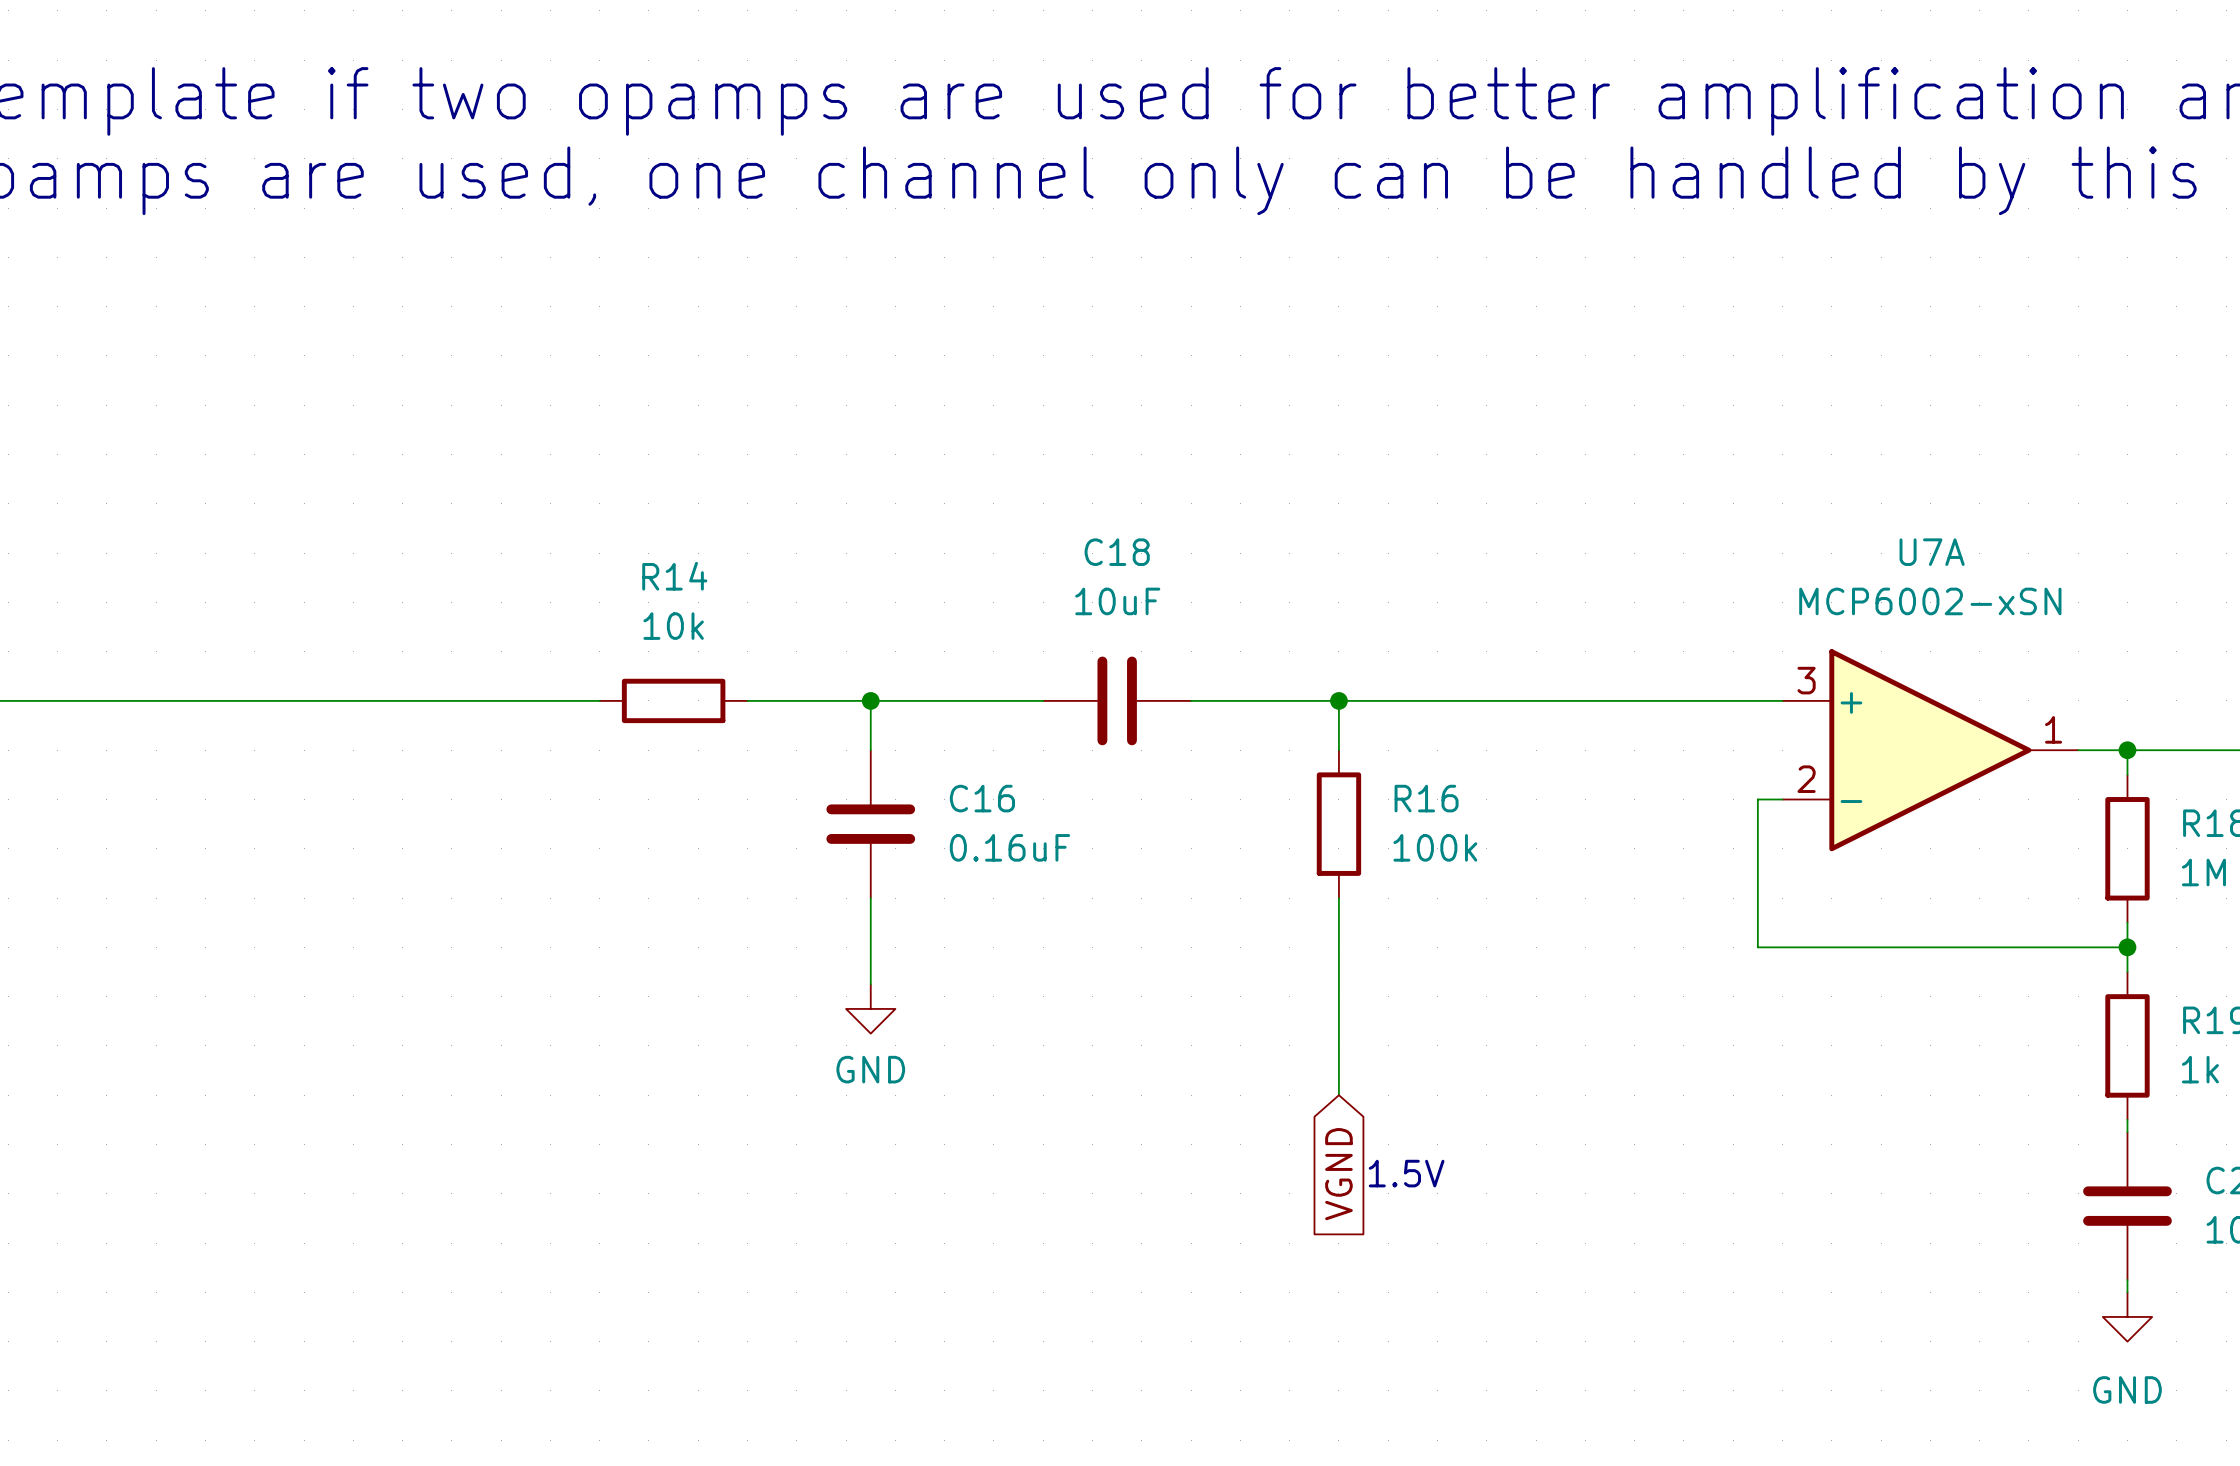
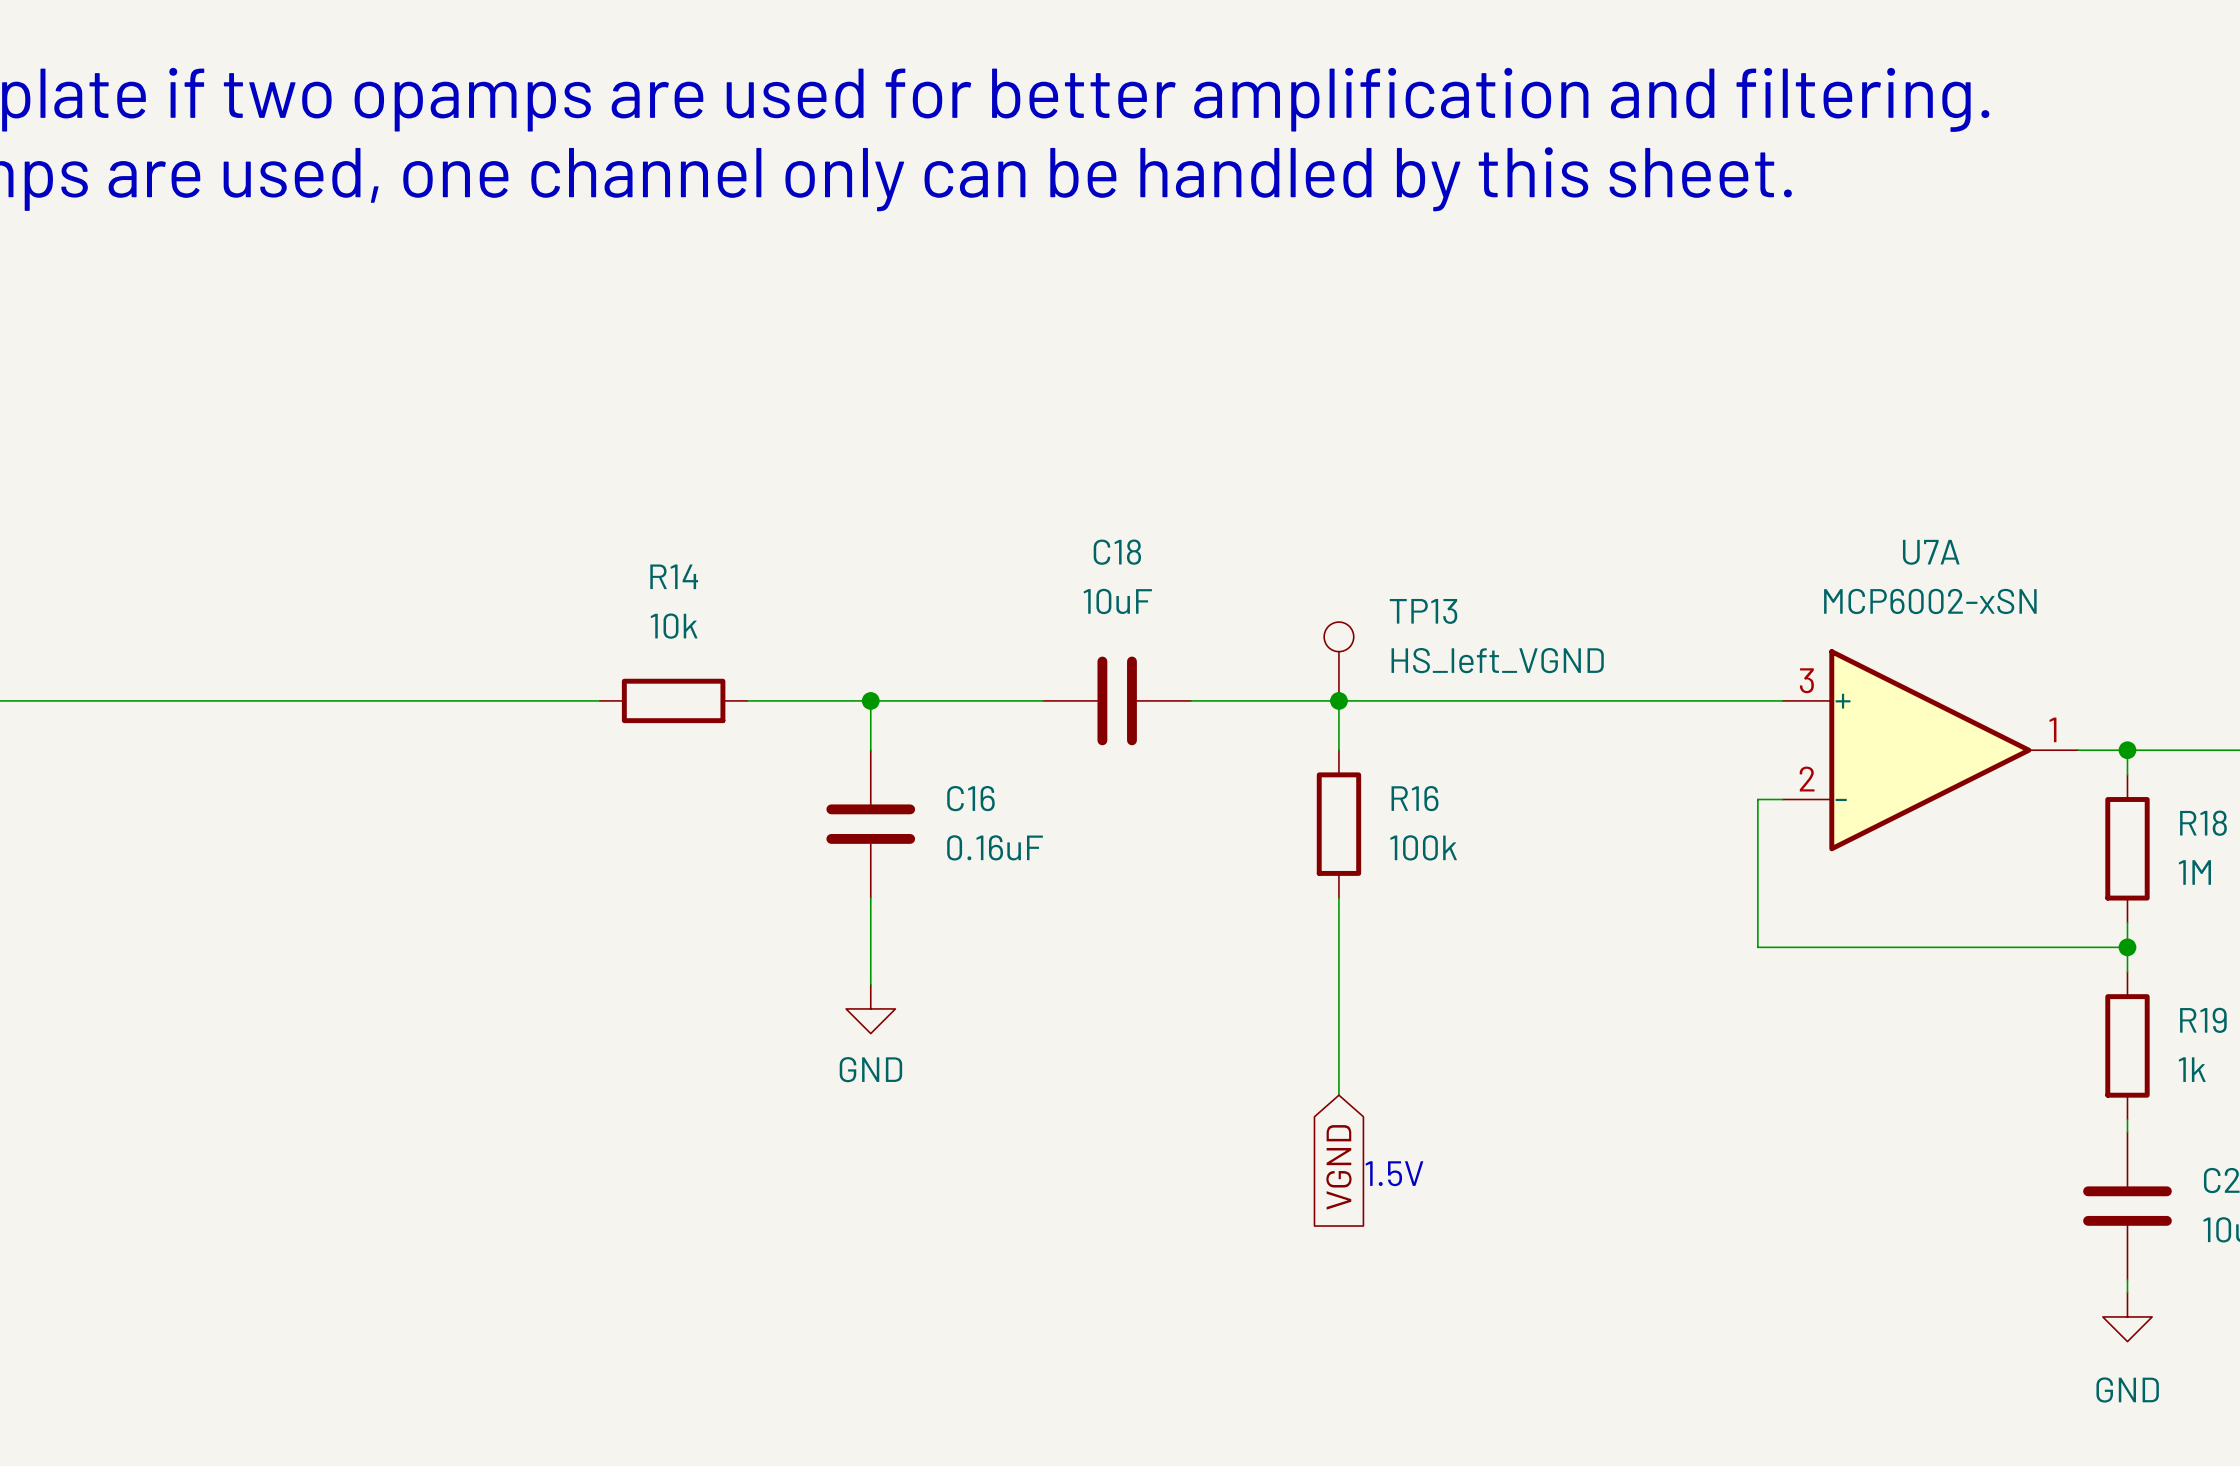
TP13: none -> HS_left_VGND (1338, 661)

